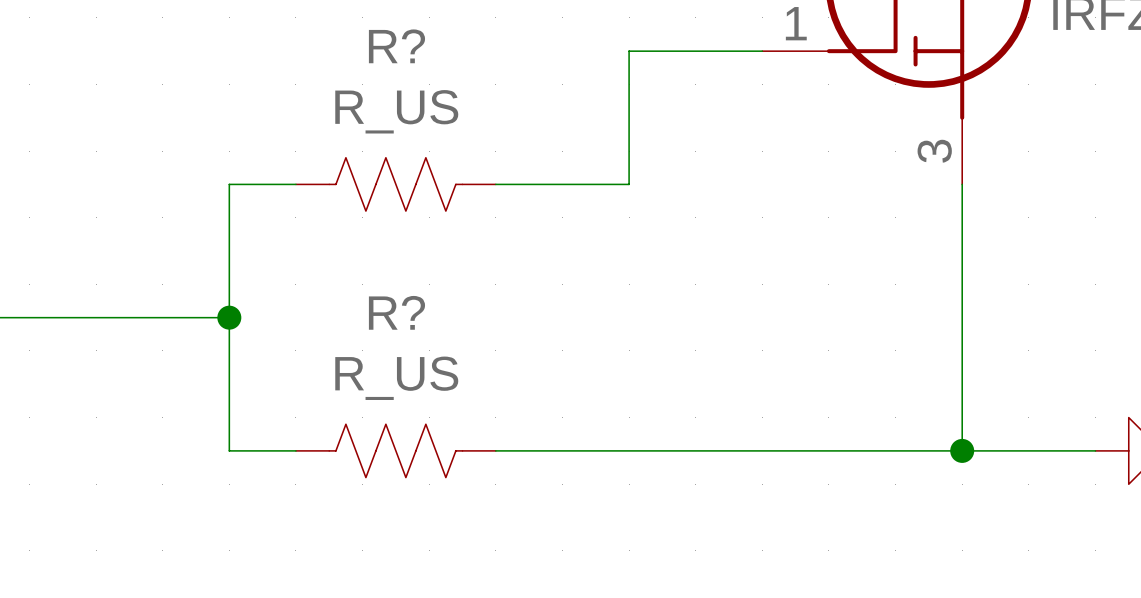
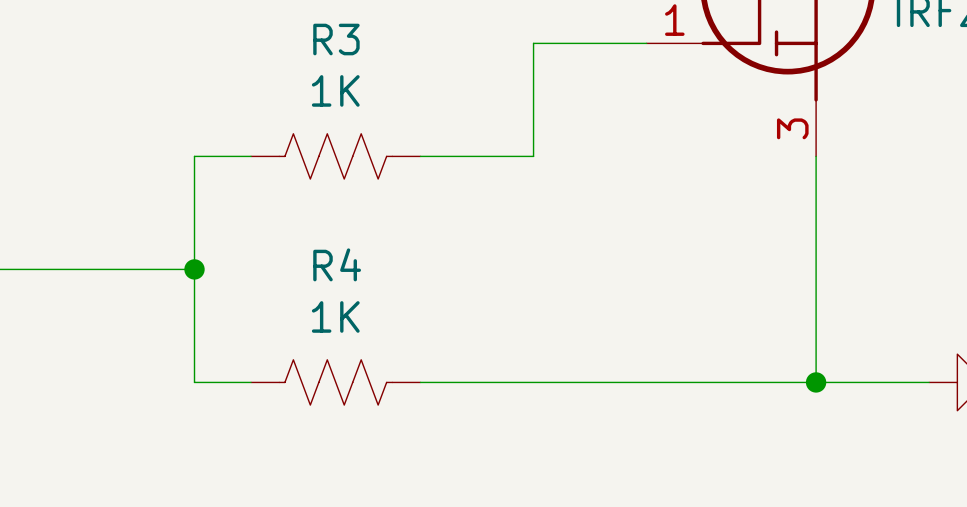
R? name: R? (396, 46) -> R3 (336, 39)
R? value: R_US (396, 111) -> 1K (335, 90)
R? name: R? (396, 312) -> R4 (337, 264)
R? value: R_US (396, 378) -> 1K (335, 316)

